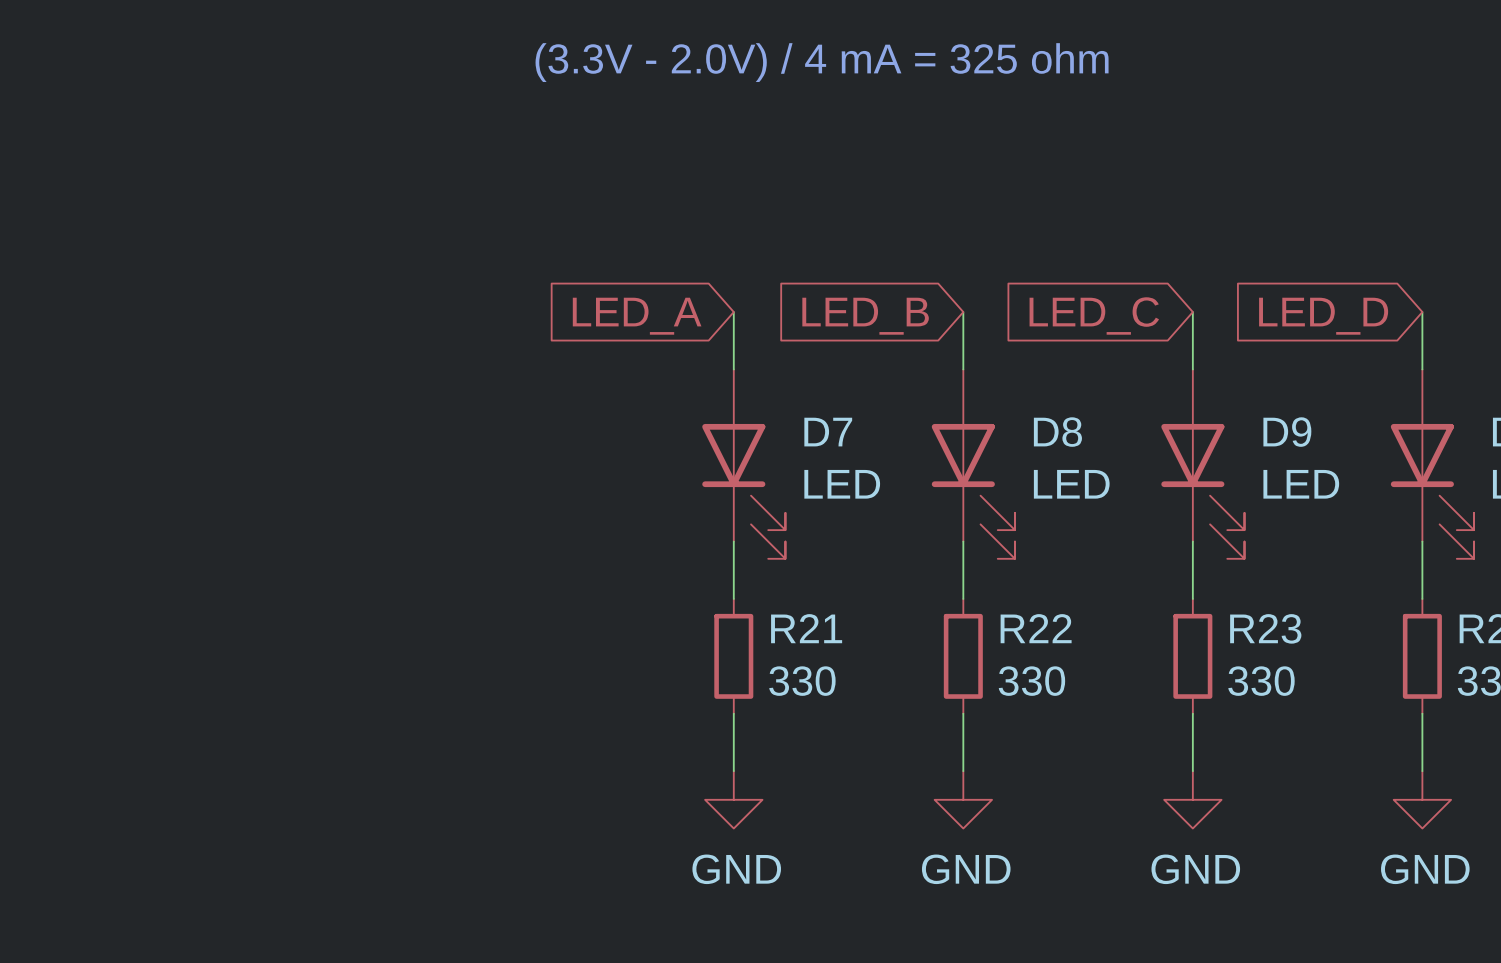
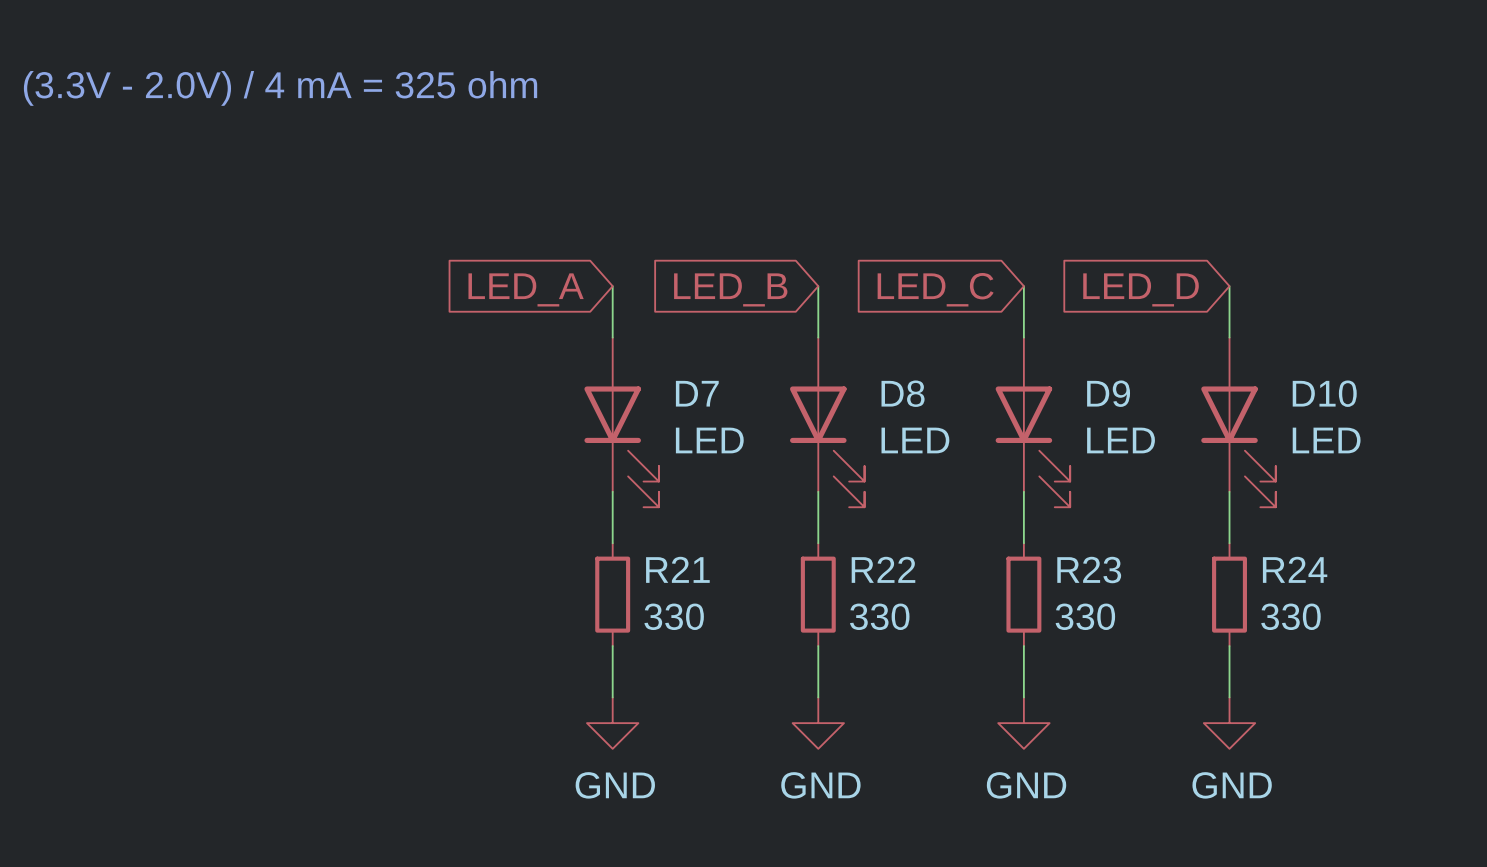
text position: (3.3V - 2.0V) / 4 mA = 325 ohm (822, 62) -> (3.3V - 2.0V) / 4 mA = 325 ohm (280, 88)

